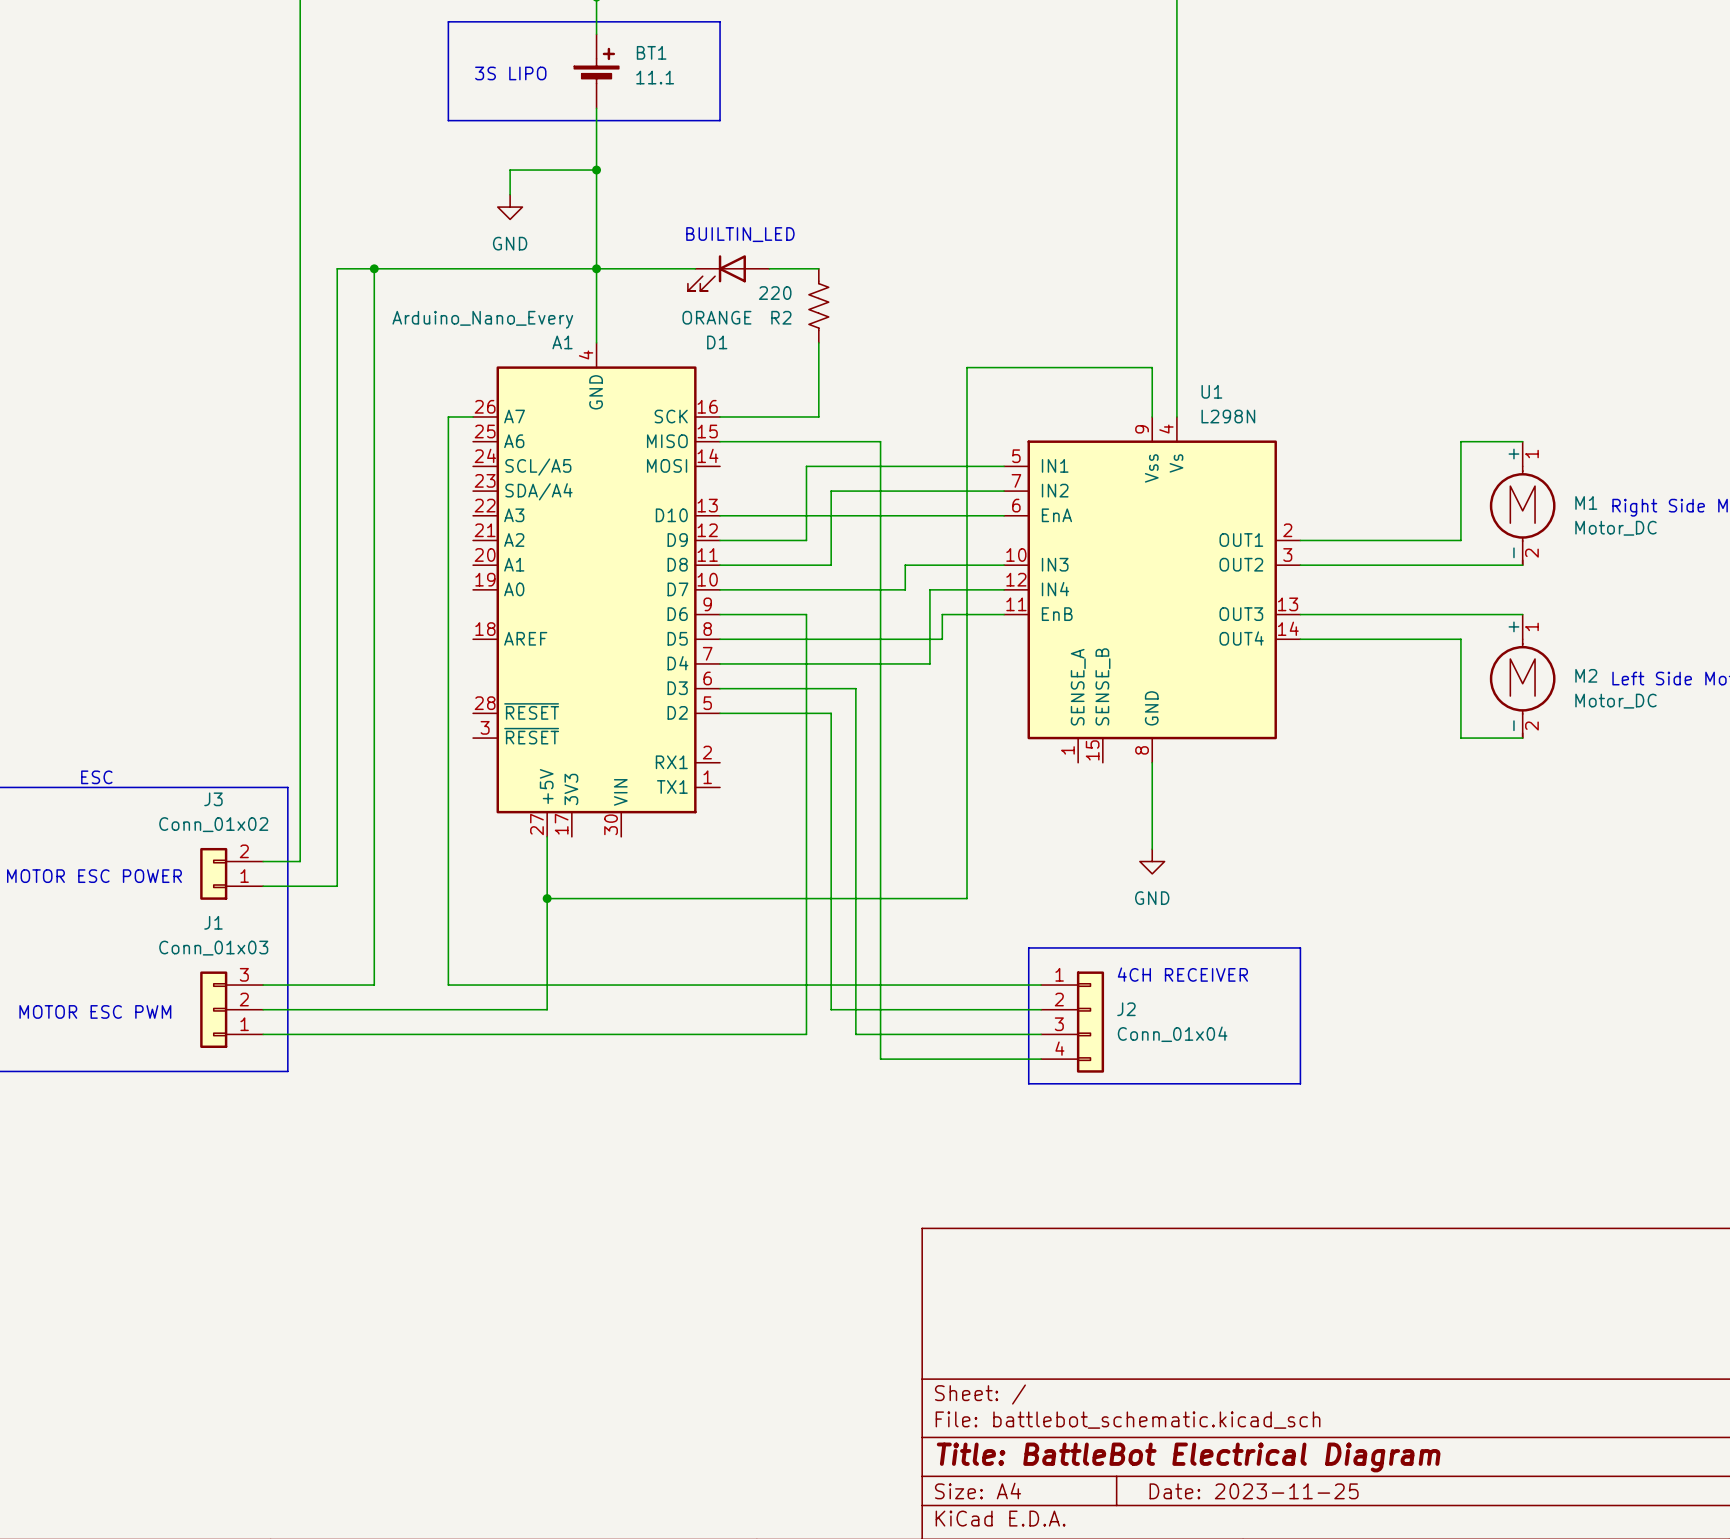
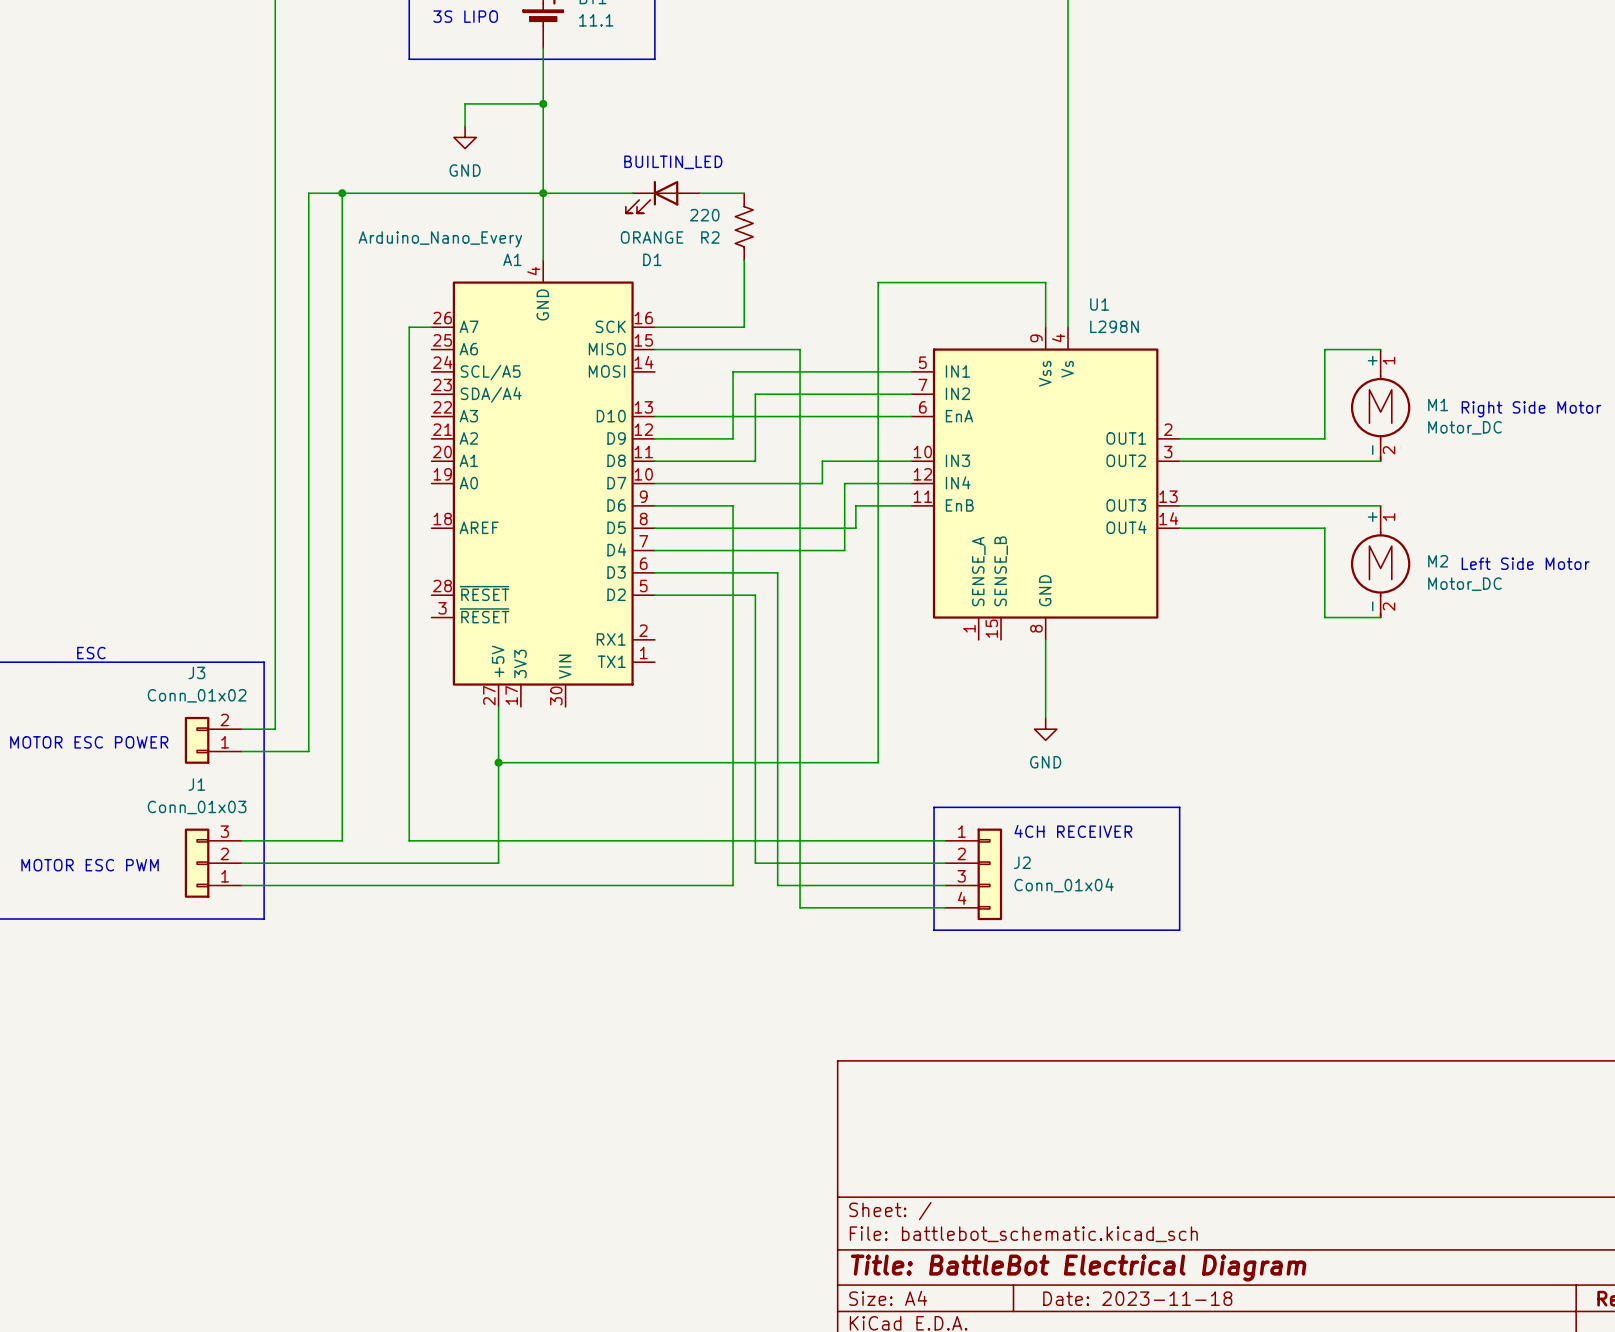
title block: Date: 2023-11-25 (1254, 1491) -> Date: 2023-11-18 (1137, 1298)

